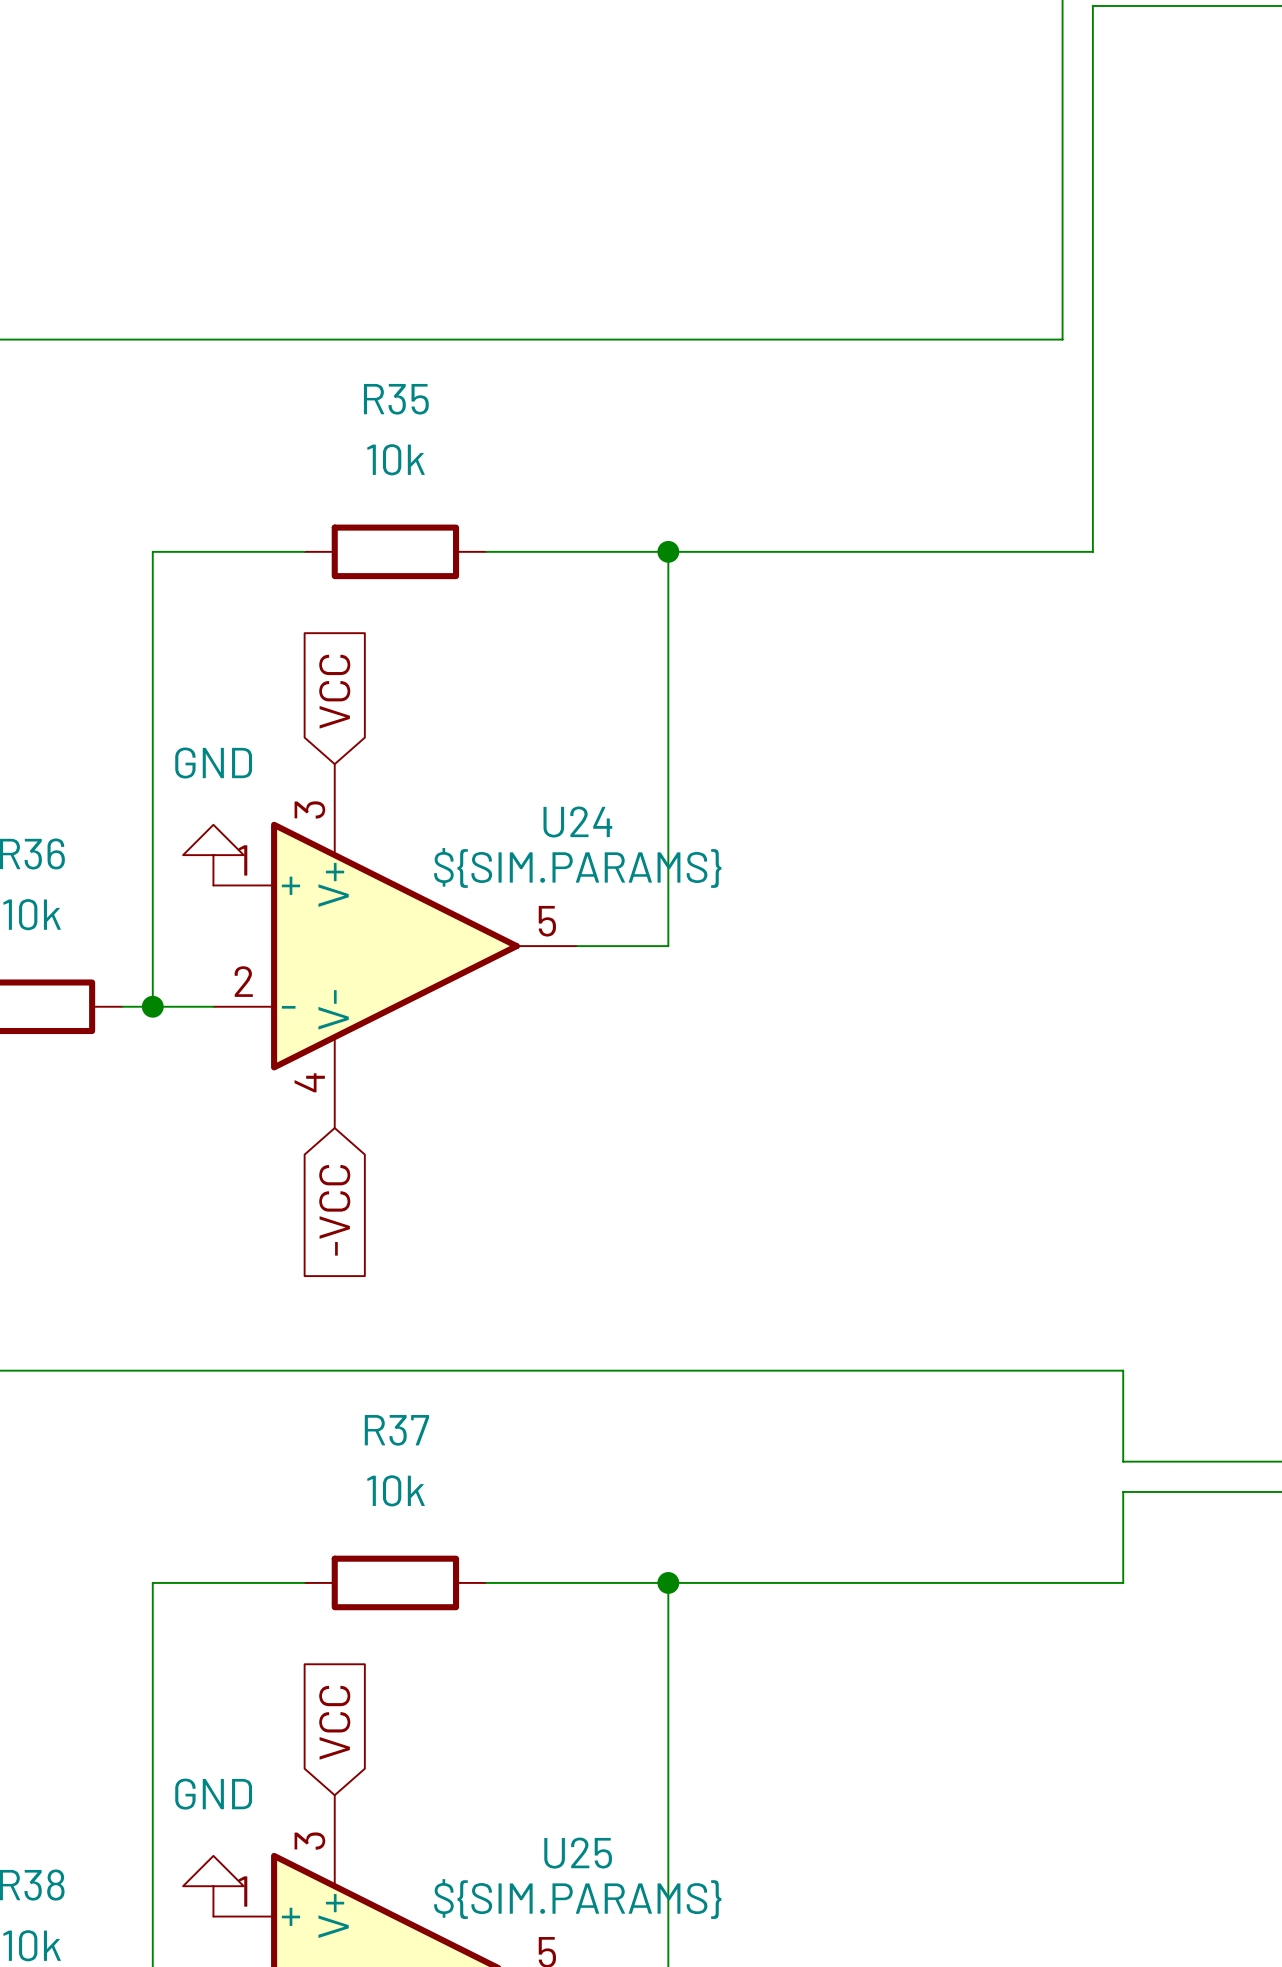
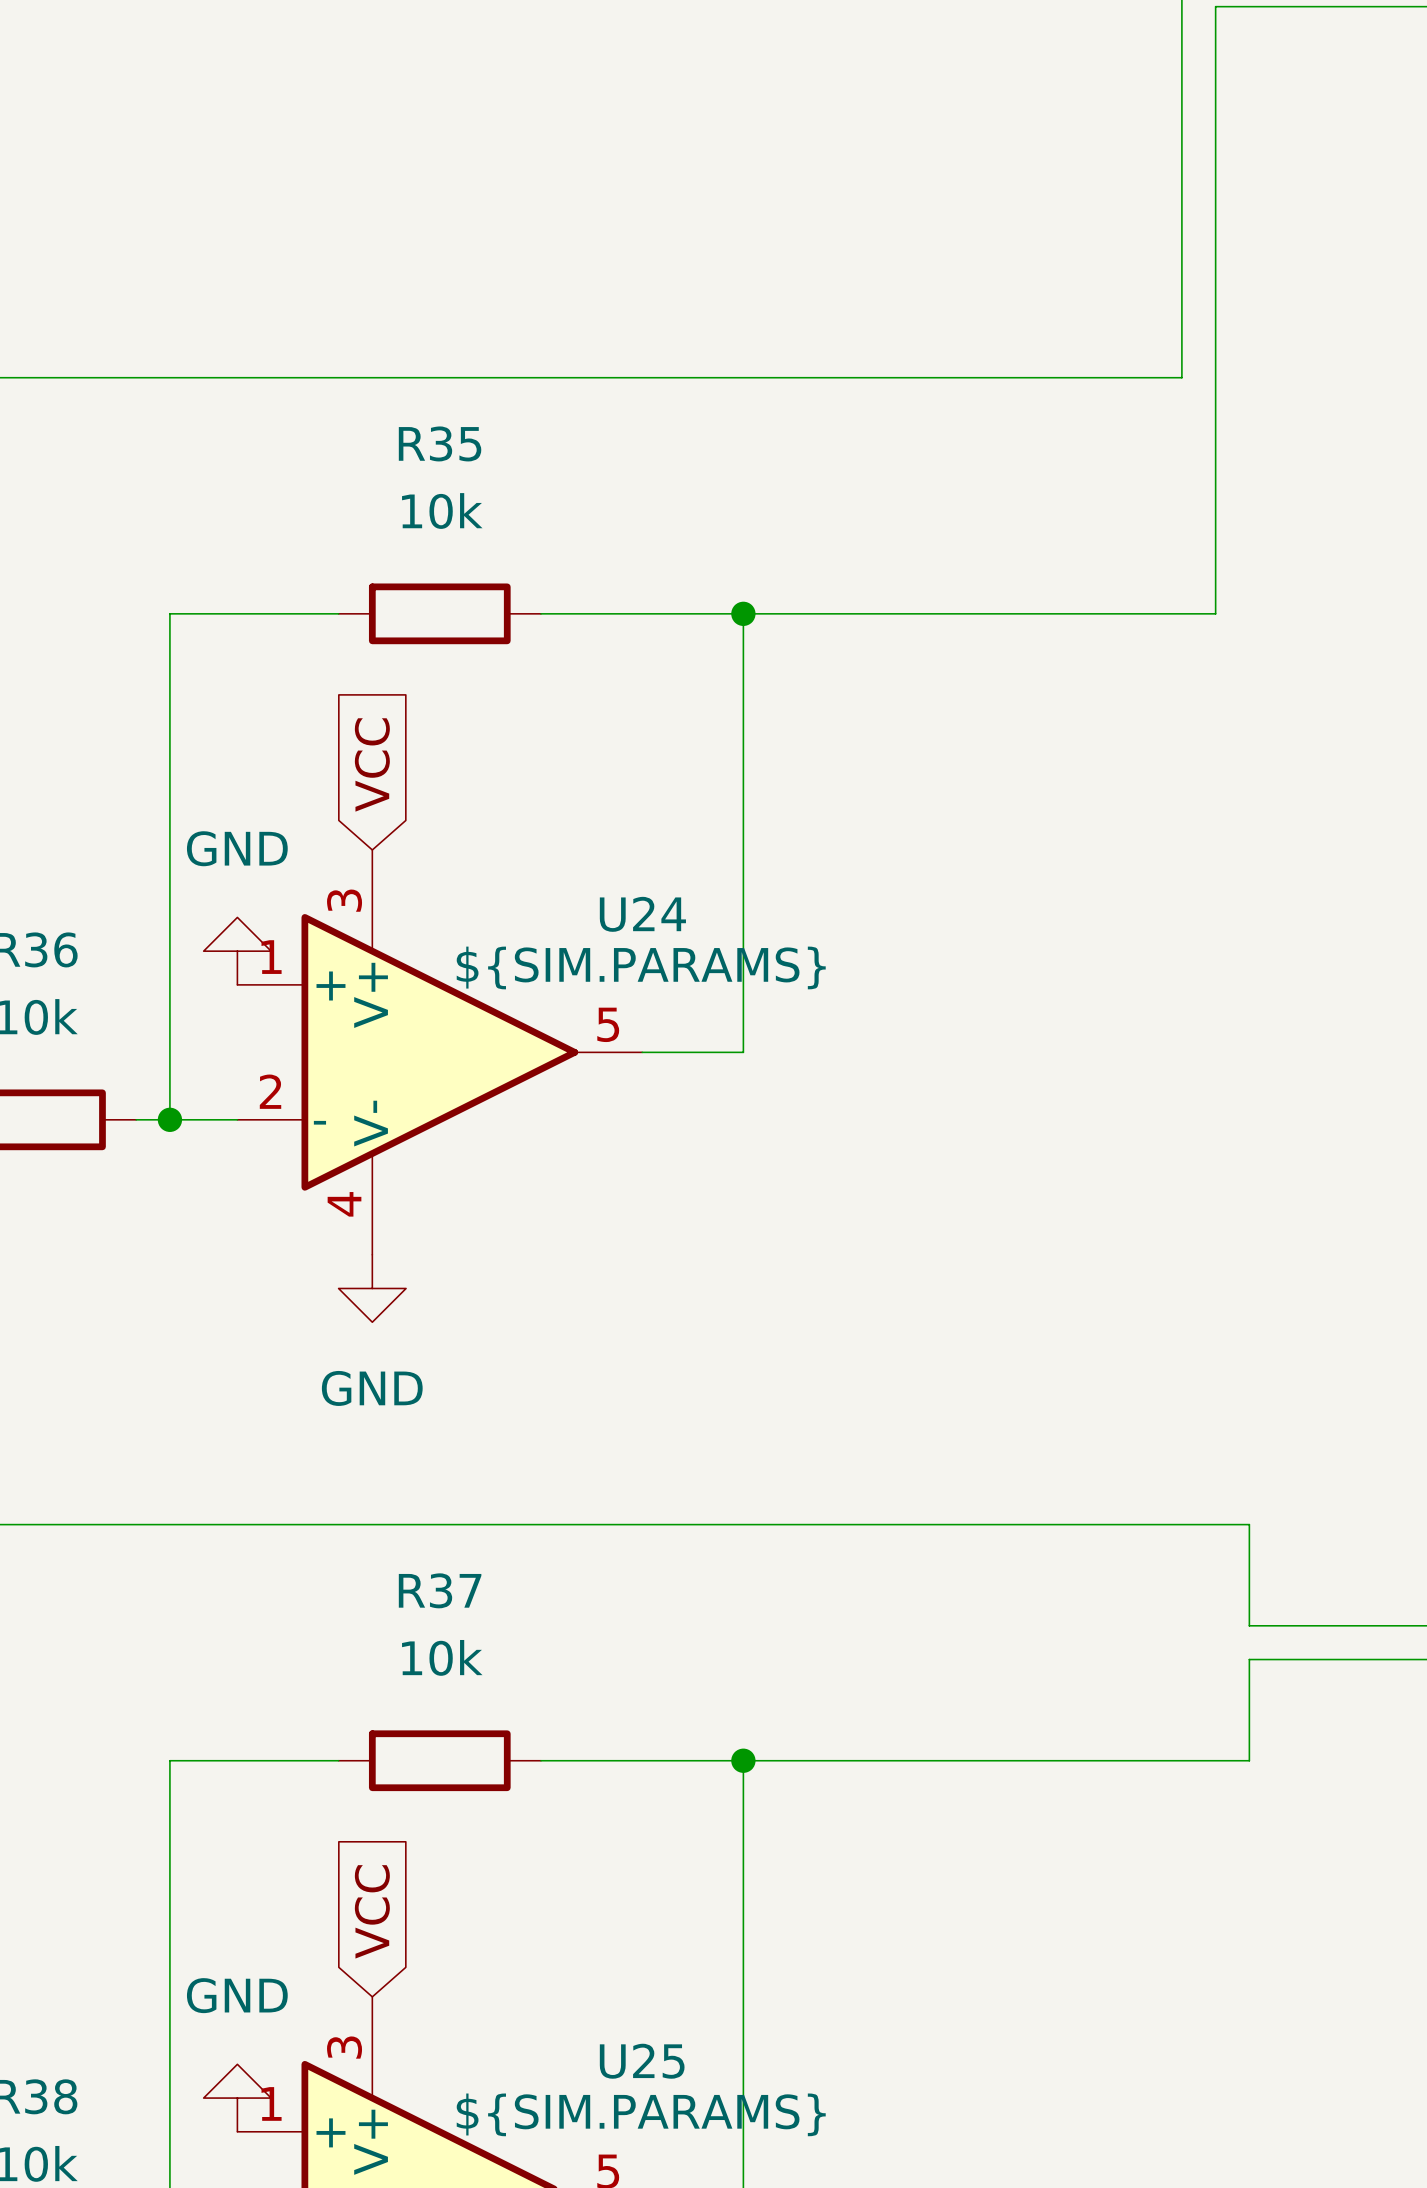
power symbol: none -> GND (372, 1288)
global label: -VCC (334, 1210) -> none

